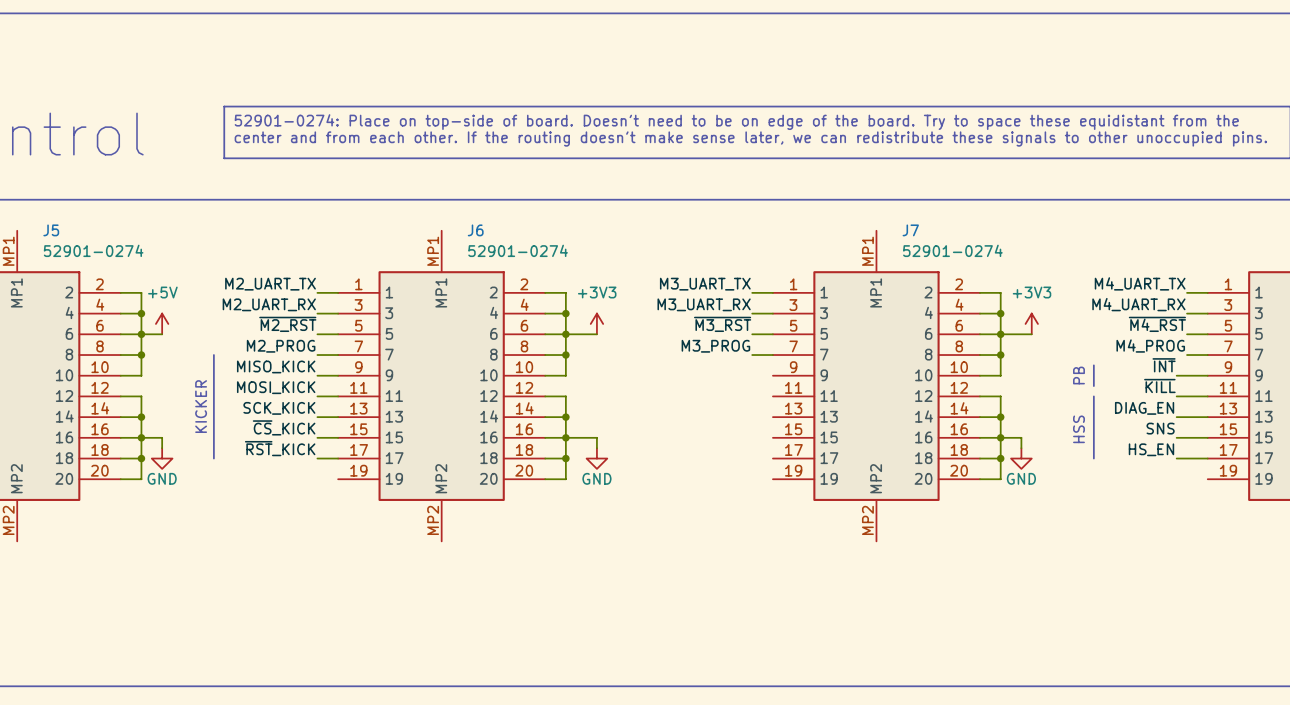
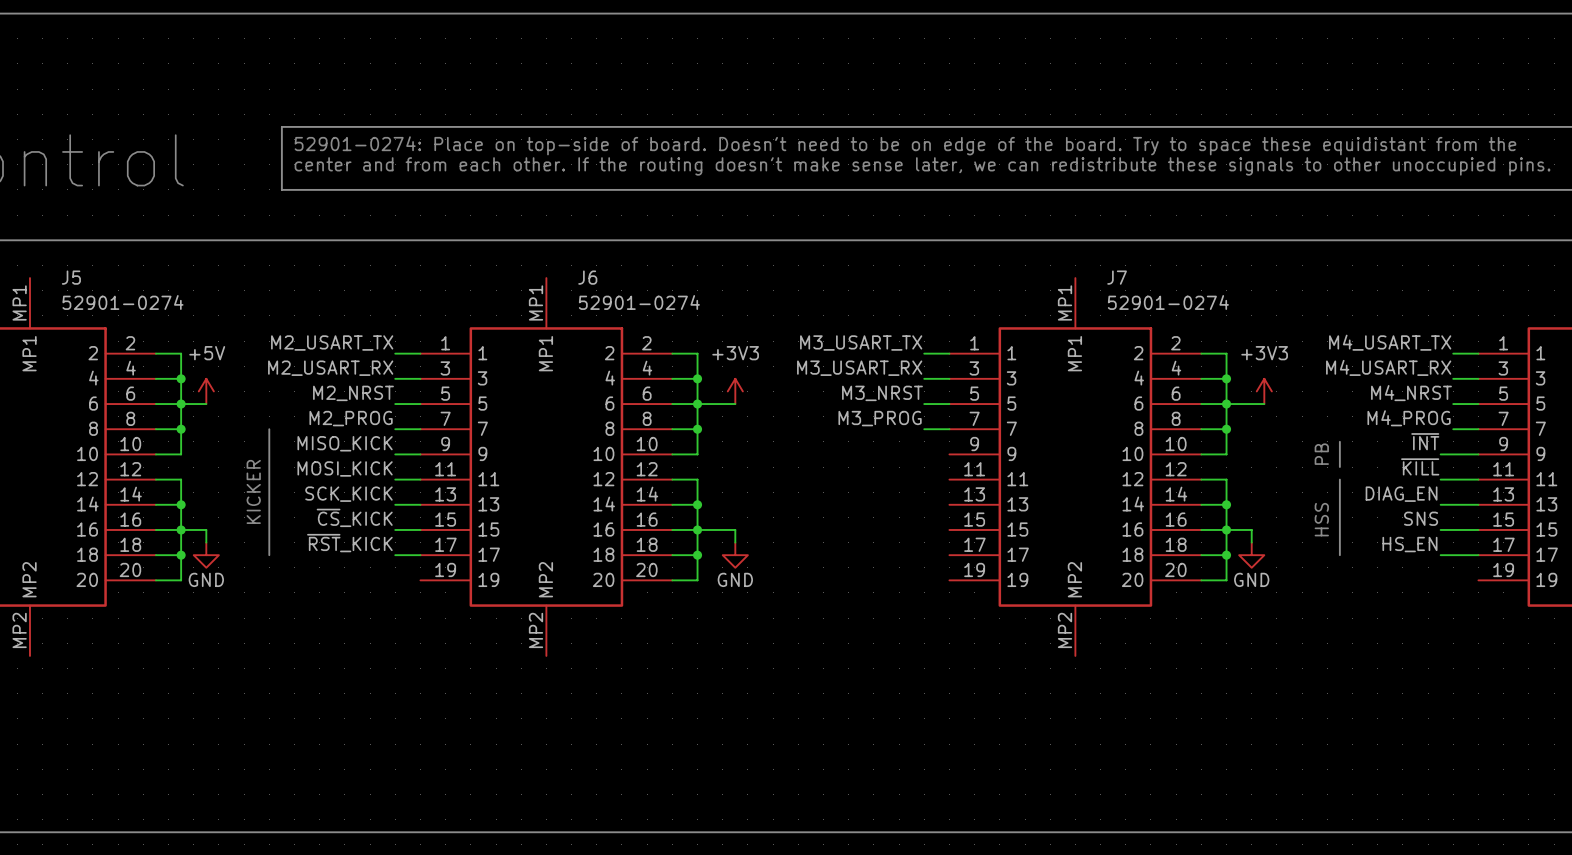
label: M4_UART_TX (1140, 283) -> M4_USART_TX (1390, 342)
label: M2_UART_TX (270, 284) -> M2_USART_TX (332, 343)
label: M3_UART_TX (705, 284) -> M3_USART_TX (861, 343)
label: M2_UART_RX (269, 304) -> M2_USART_RX (330, 368)
label: M3_UART_RX (704, 304) -> M3_USART_RX (859, 368)
label: M4_UART_RX (1138, 304) -> M4_USART_RX (1388, 367)
label: ~{M2_RST} (287, 324) -> M2_NRST (353, 393)
label: ~{M3_RST} (722, 324) -> M3_NRST (882, 393)
label: ~{M4_RST} (1157, 324) -> M4_NRST (1411, 393)

